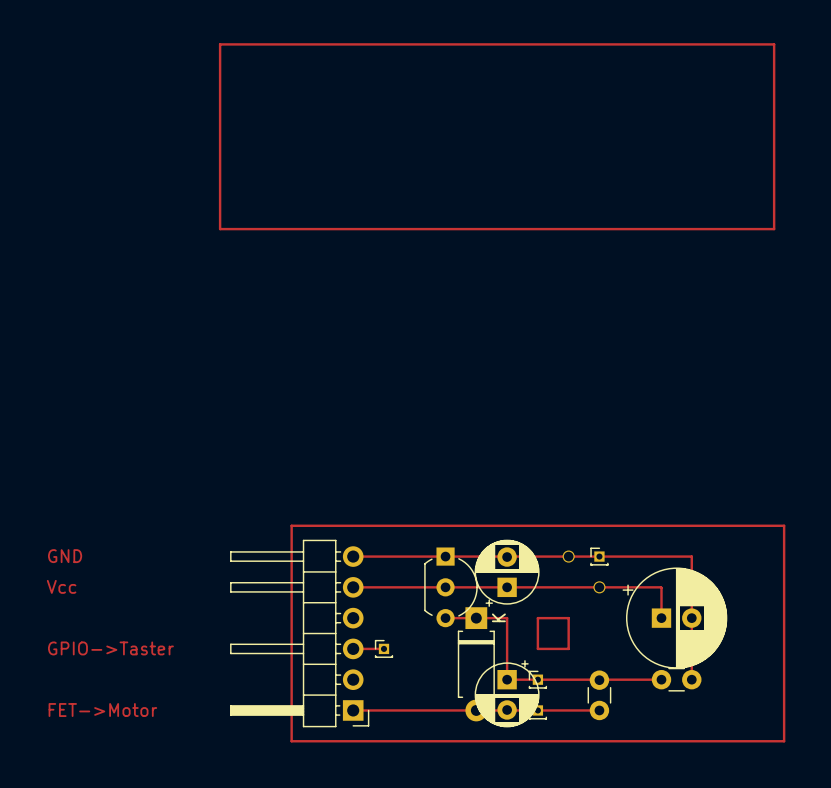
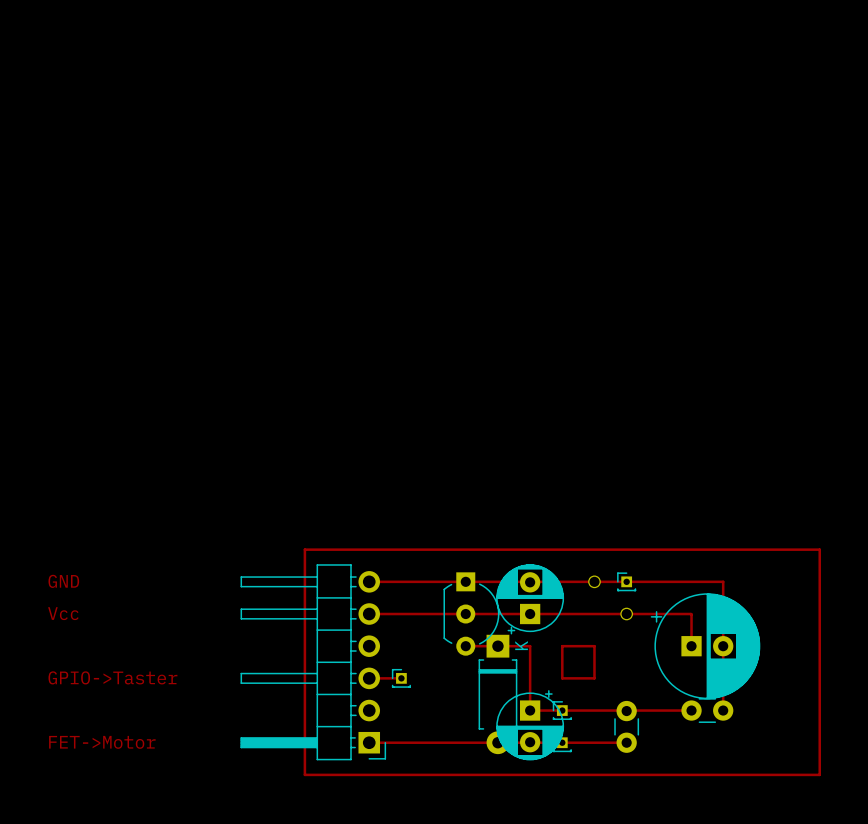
top track: (220, 44) (774, 44) (774, 229) (220, 229) (220, 44) -> none

